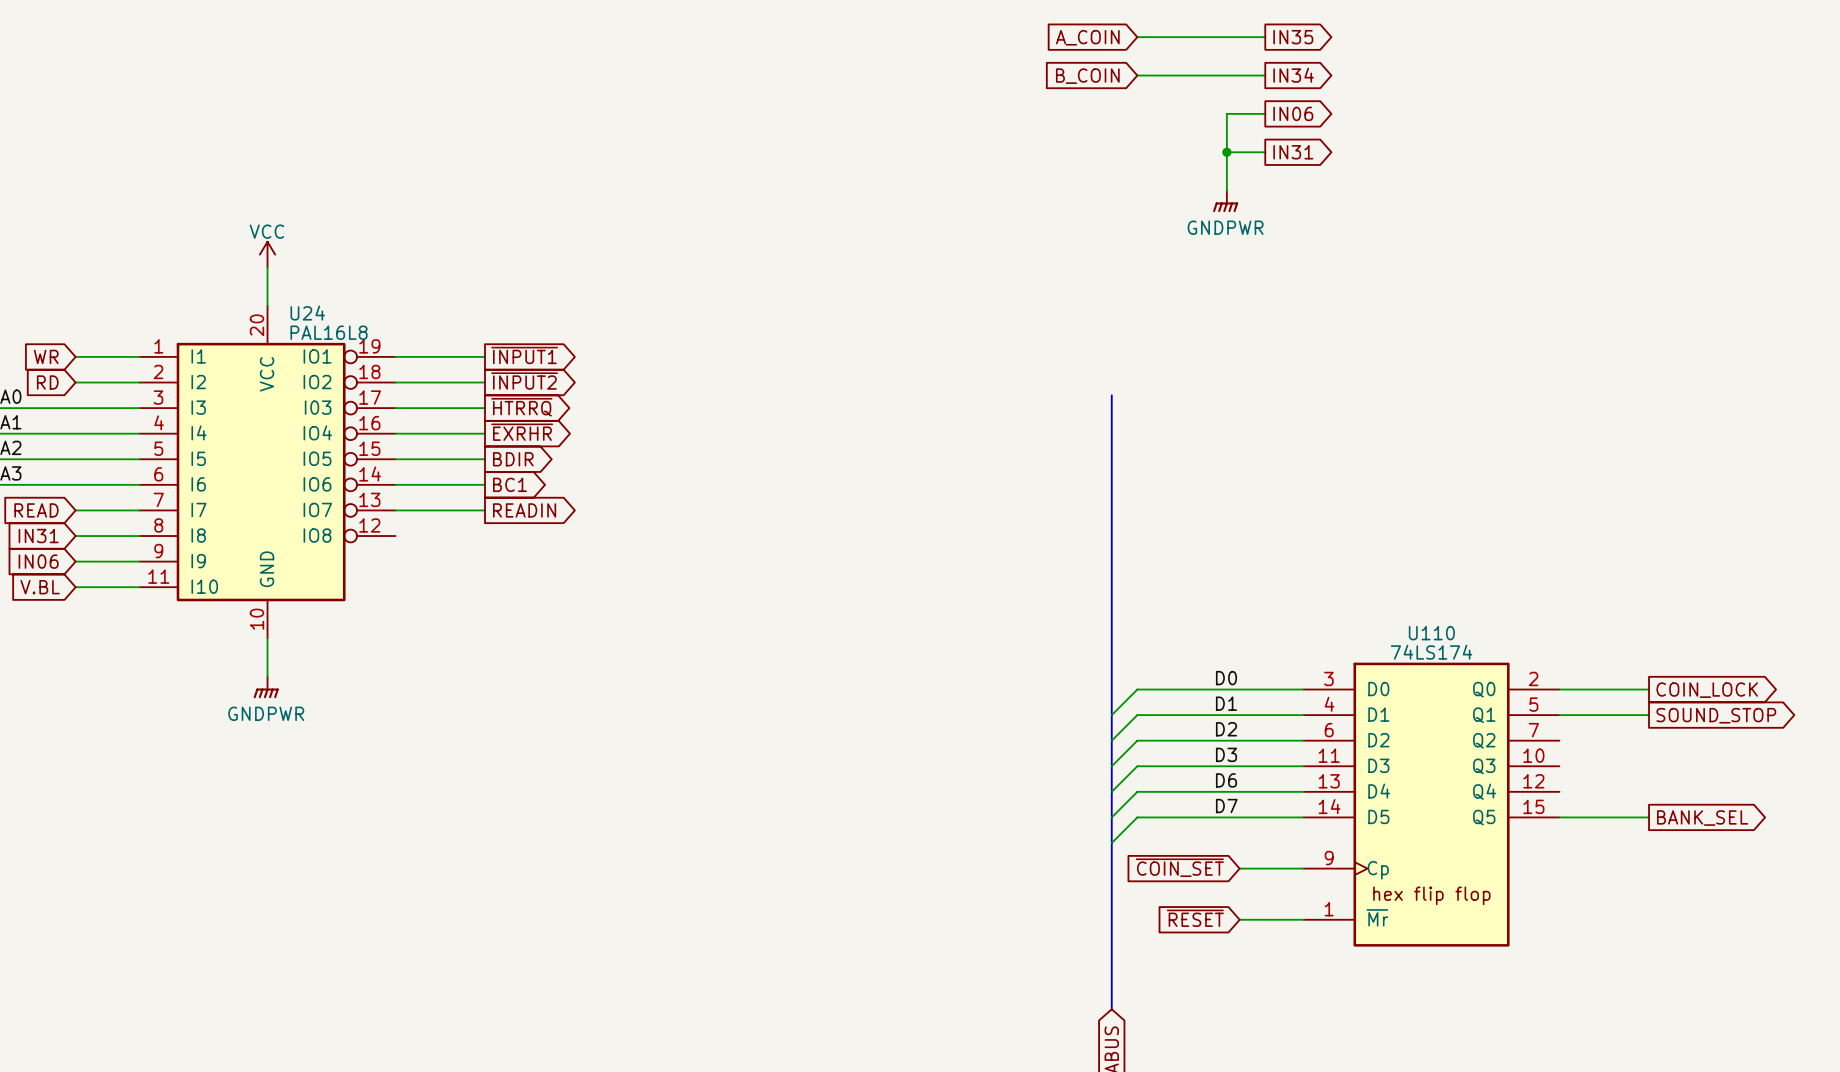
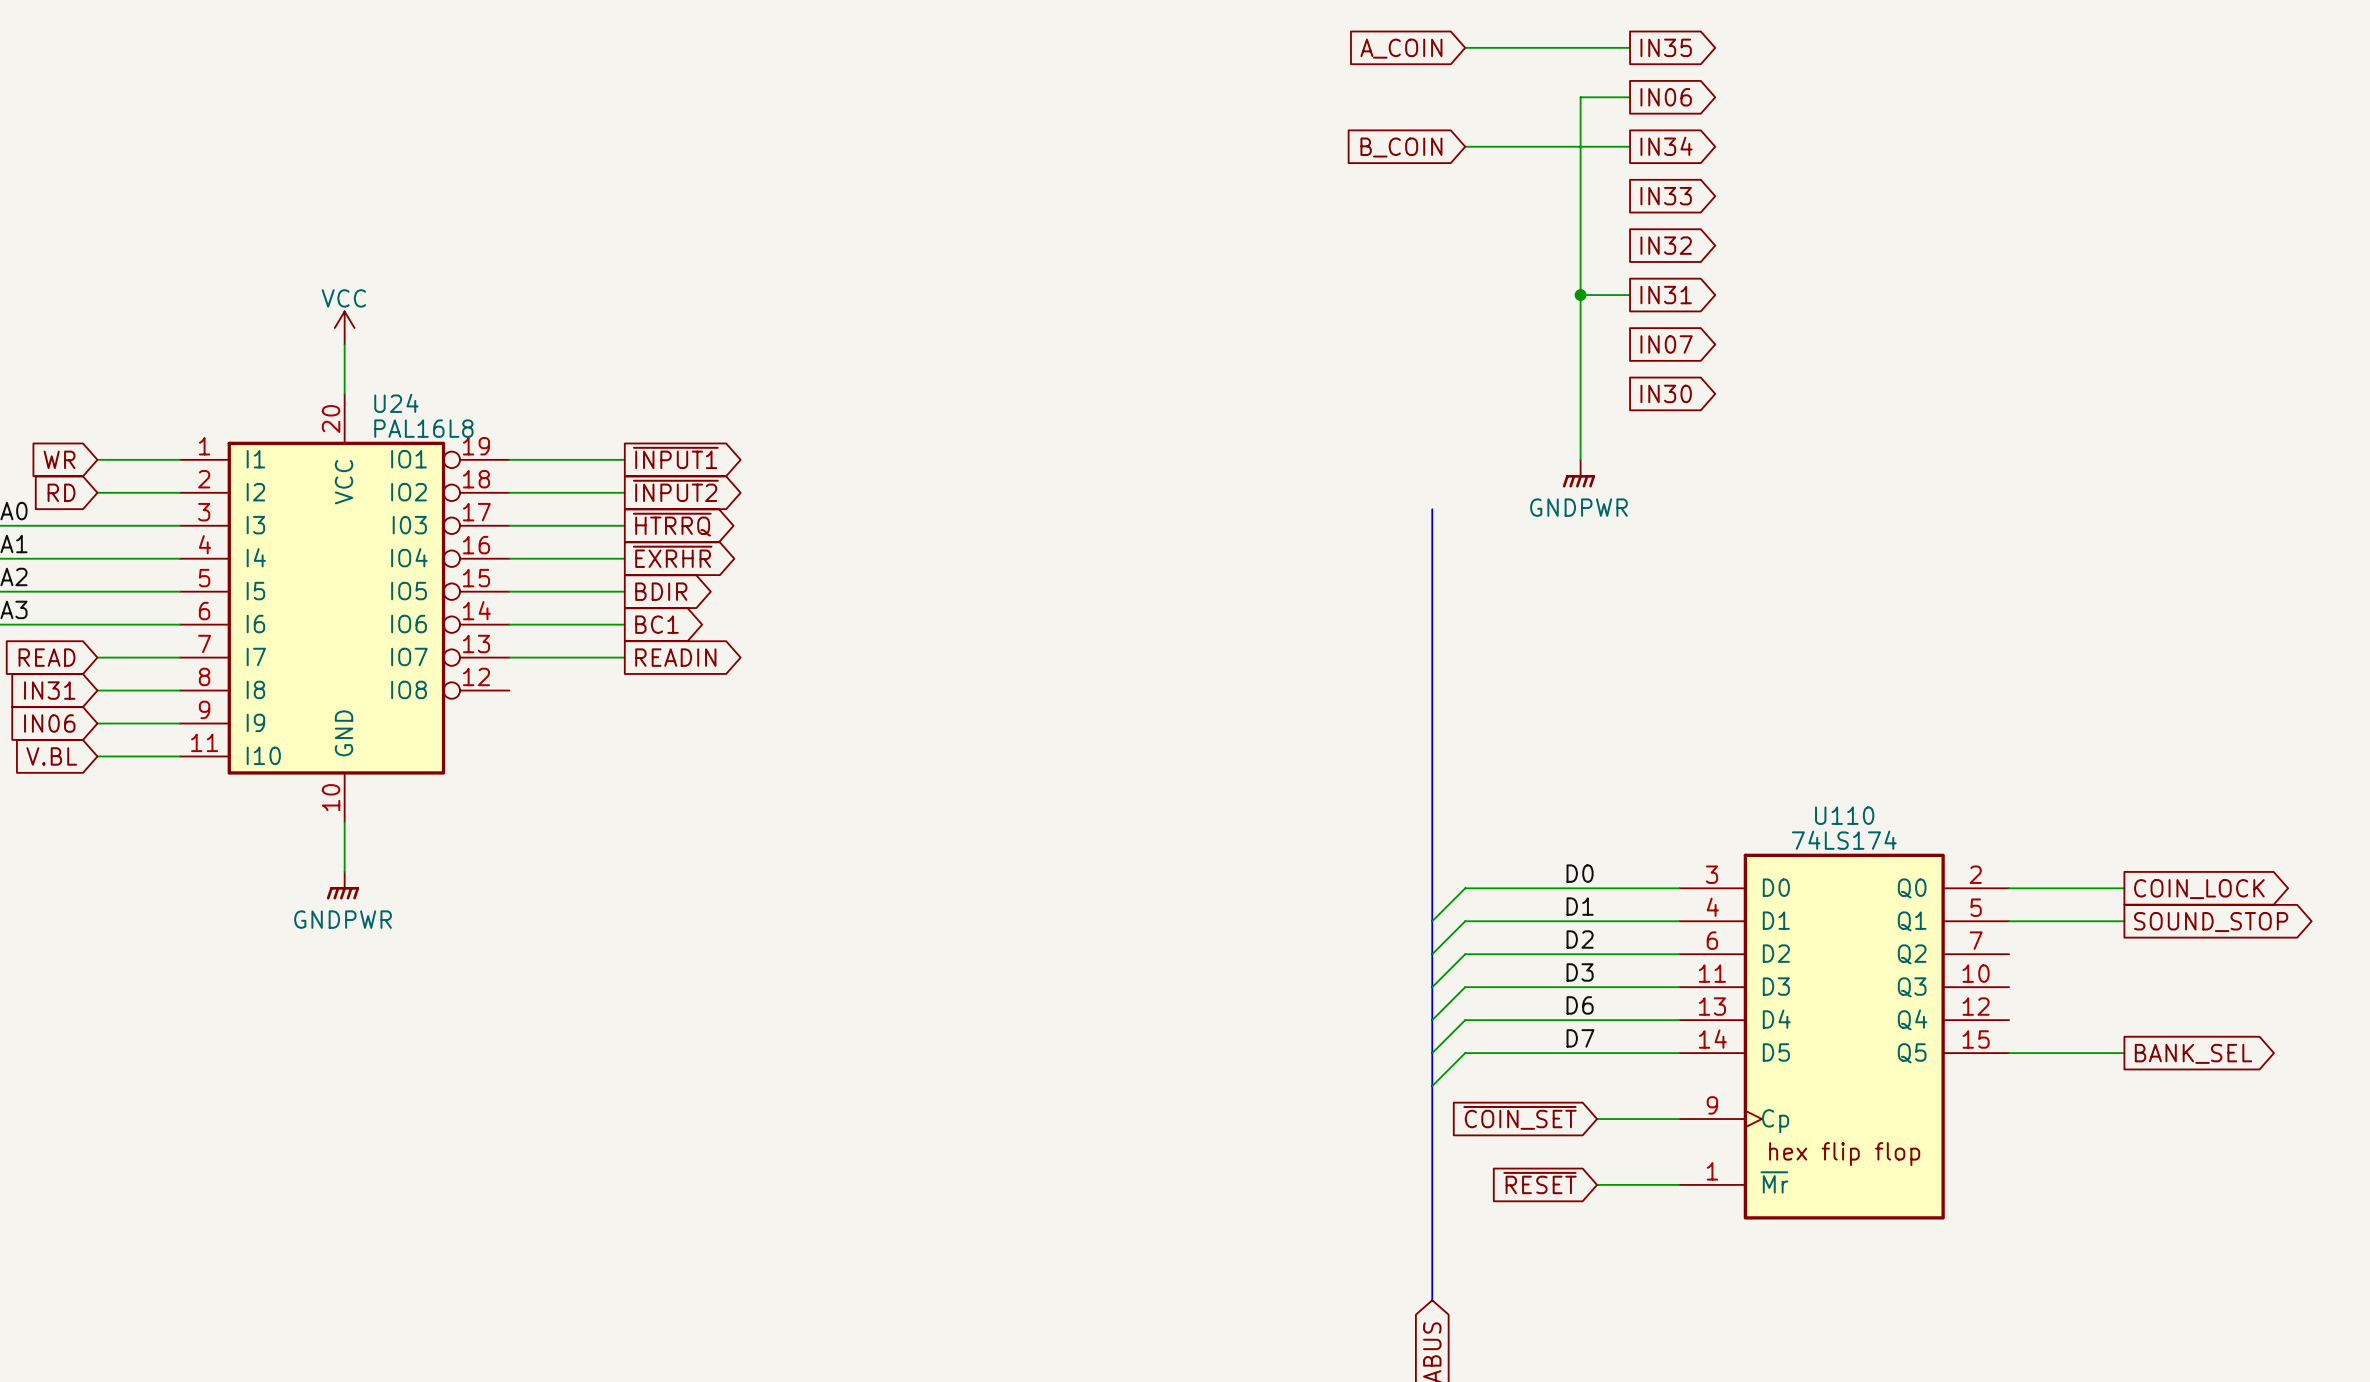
wire: (1137, 75) (1226, 75) -> (1465, 146) (1580, 146) (1580, 97)
global label: IN34 (1293, 75) -> IN06 (1666, 97)
global label position: B_COIN (1087, 76) -> B_COIN (1401, 147)
global label: IN06 (1293, 113) -> IN34 (1666, 146)
wire: (1226, 152) (1265, 152) -> (1580, 295) (1630, 295)
junction: (1226, 152) -> none
global label: IN31 (1293, 152) -> IN33 (1666, 196)
wire: none -> (1580, 245) (1580, 459)
global label: none -> IN32 (1666, 245)
power symbol position: GNDPWR (1225, 201) -> GNDPWR (1578, 473)
junction: none -> (1580, 295)
global label: none -> IN31 (1666, 295)
global label: none -> IN07 (1666, 344)
global label: none -> IN30 (1666, 393)

